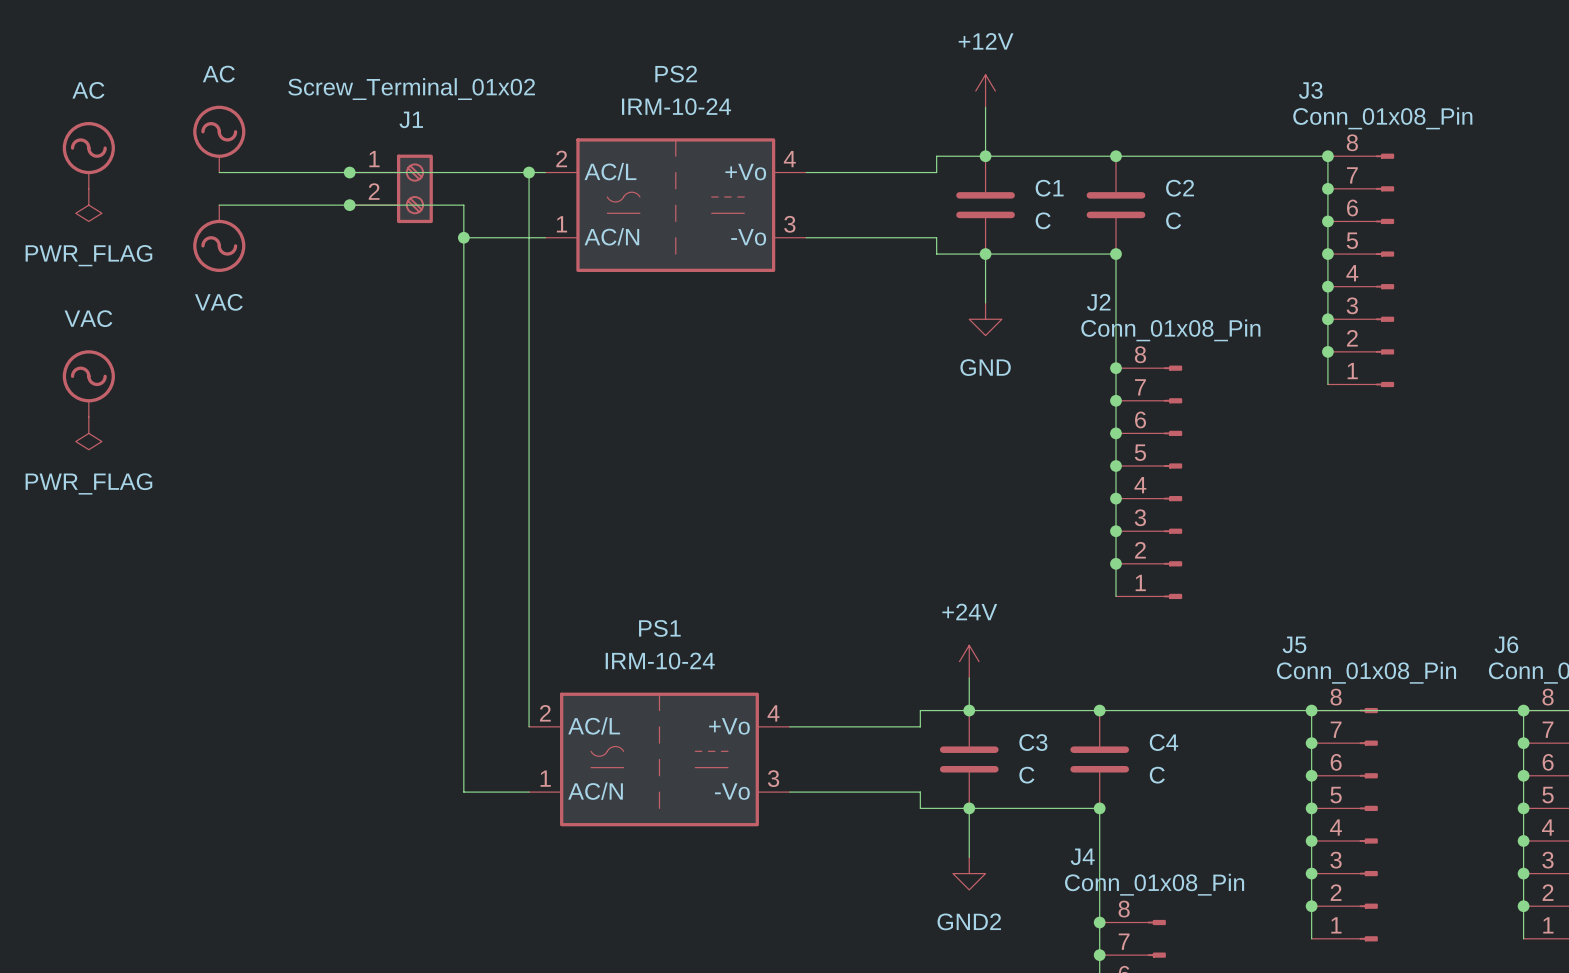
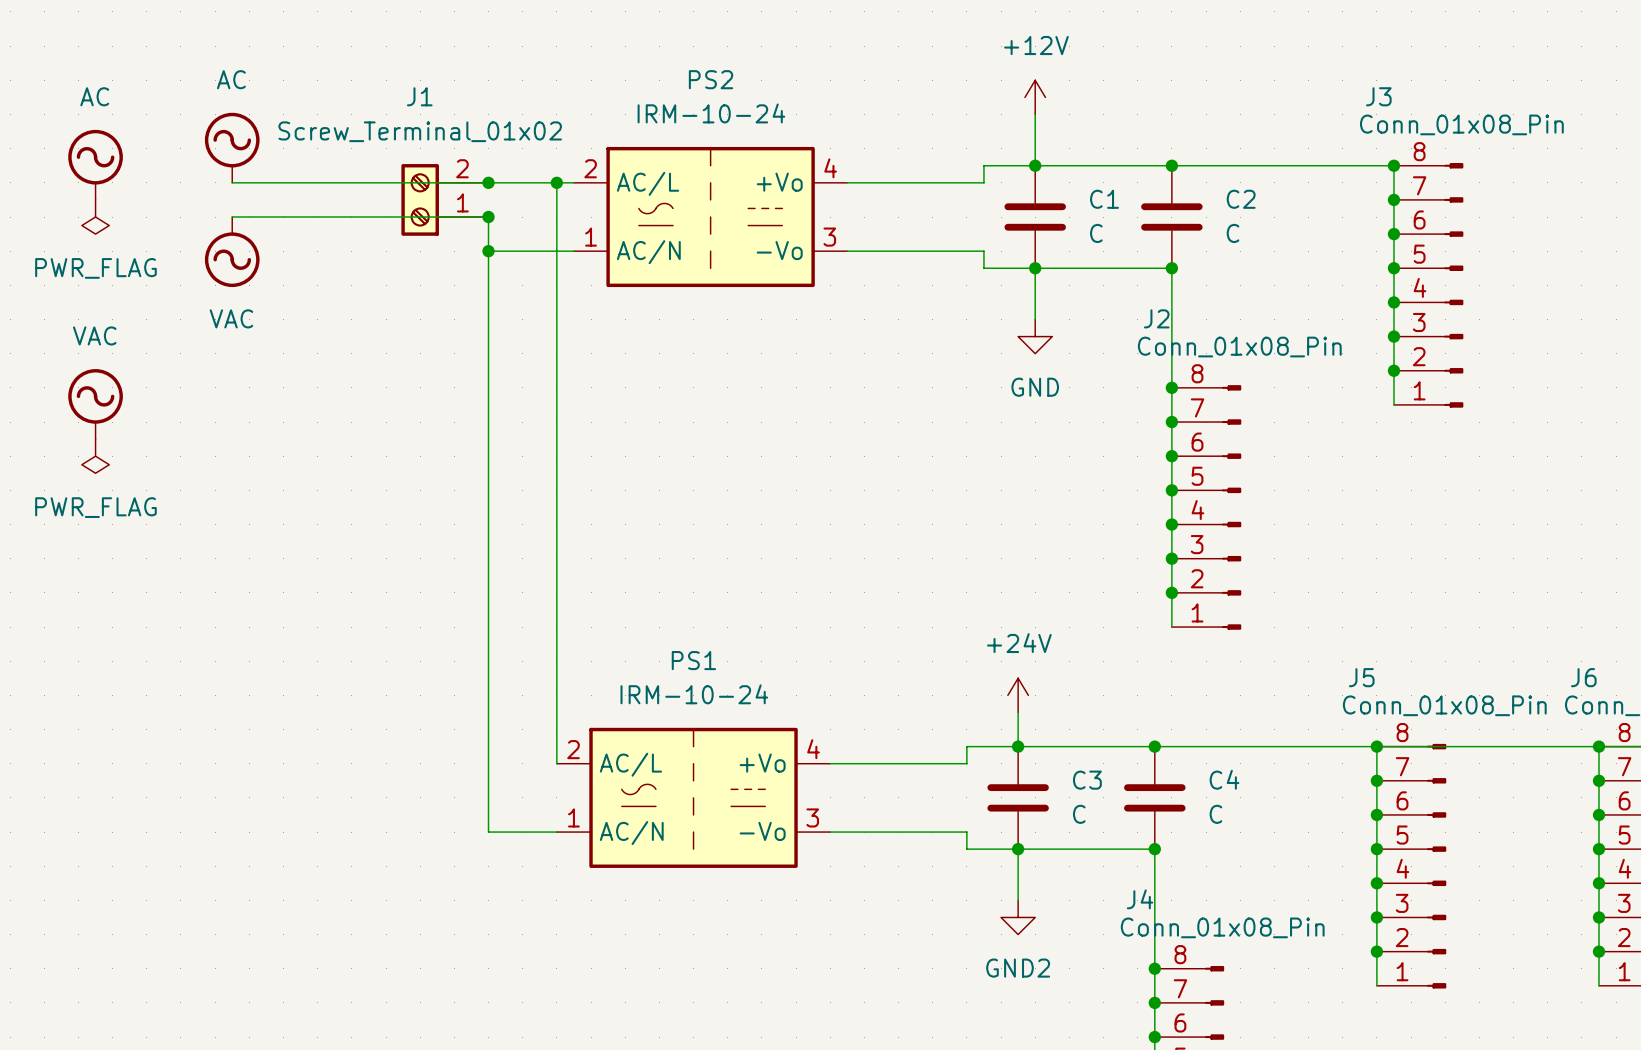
J1 value position: Screw_Terminal_01x02 (411, 89) -> Screw_Terminal_01x02 (420, 131)
J1 name position: J1 (411, 119) -> J1 (419, 96)
junction: (349, 172) -> none
junction: none -> (488, 182)
J1 rotation: 0° (414, 188) -> 180° (420, 199)
junction: (349, 205) -> none
junction: none -> (488, 217)

